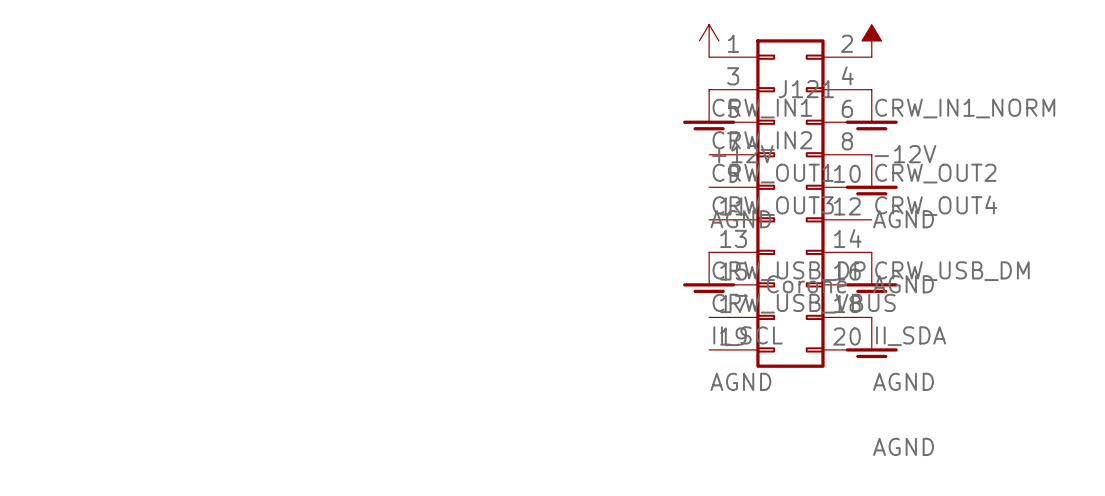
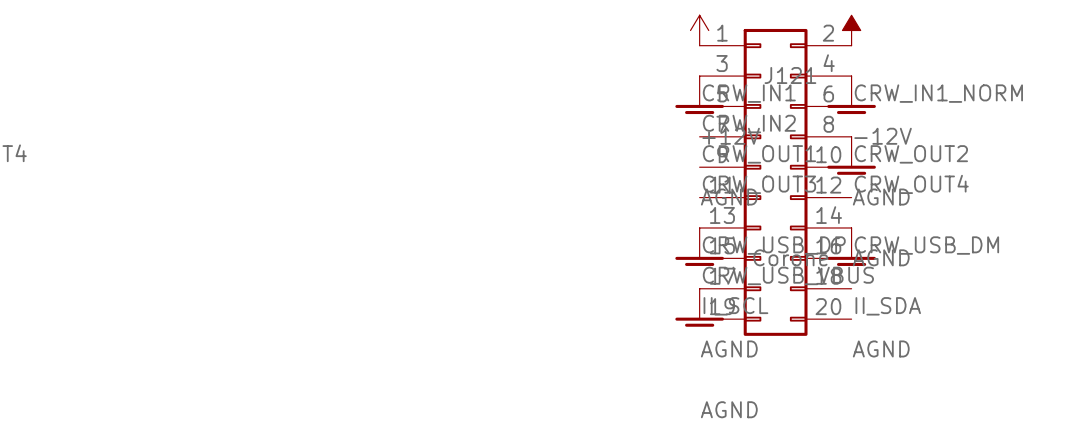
power symbol position: AGND (871, 337) -> AGND (699, 307)

